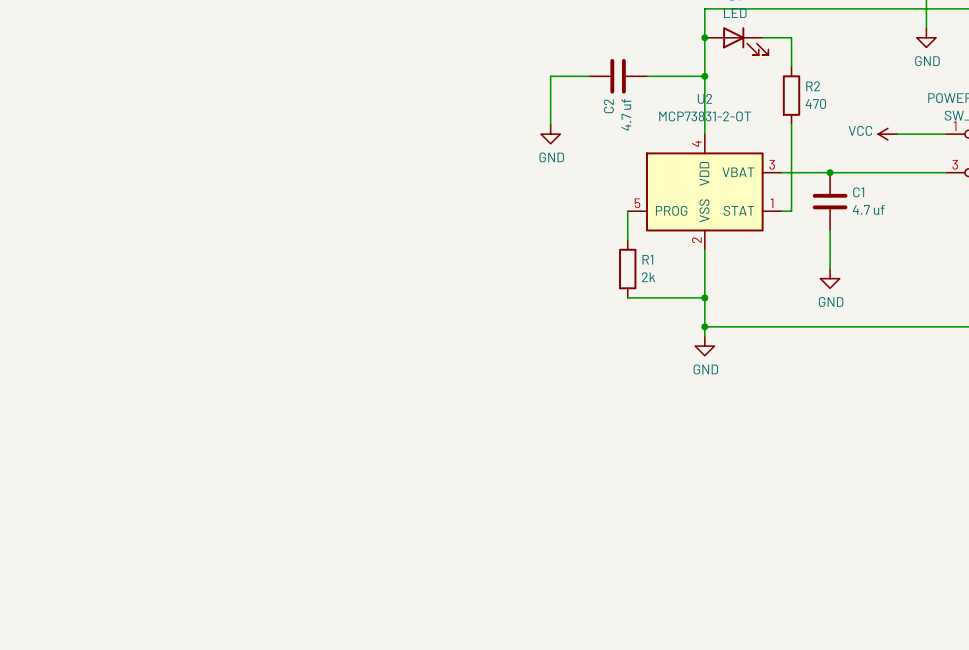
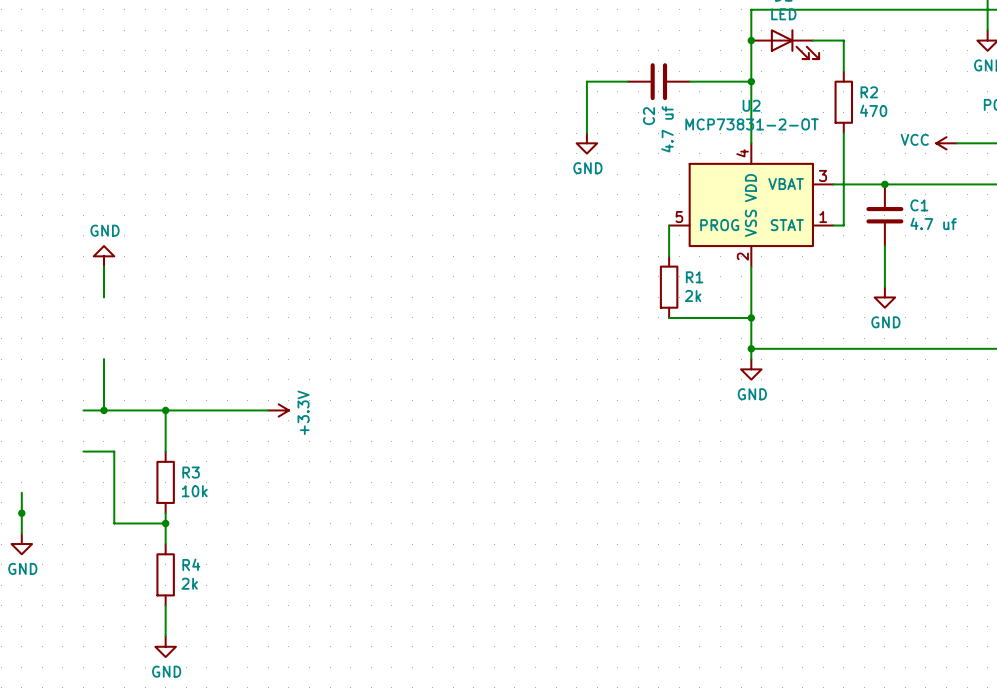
power symbol: none -> GND (103, 256)
wire: none -> (103, 266) (103, 297)
wire: none -> (103, 359) (103, 410)
wire: none -> (83, 410) (268, 410)
junction: none -> (103, 410)
wire: none -> (165, 410) (165, 451)
junction: none -> (165, 410)
power symbol: none -> +3.3V (278, 410)
wire: none -> (83, 451) (114, 451) (114, 523) (165, 523)
R3: none -> 10k (165, 482)
wire: none -> (21, 492) (21, 533)
junction: none -> (21, 513)
wire: none -> (165, 513) (165, 544)
junction: none -> (165, 523)
power symbol: none -> GND (21, 544)
R4: none -> 2k (165, 574)
wire: none -> (165, 605) (165, 636)
power symbol: none -> GND (165, 646)

